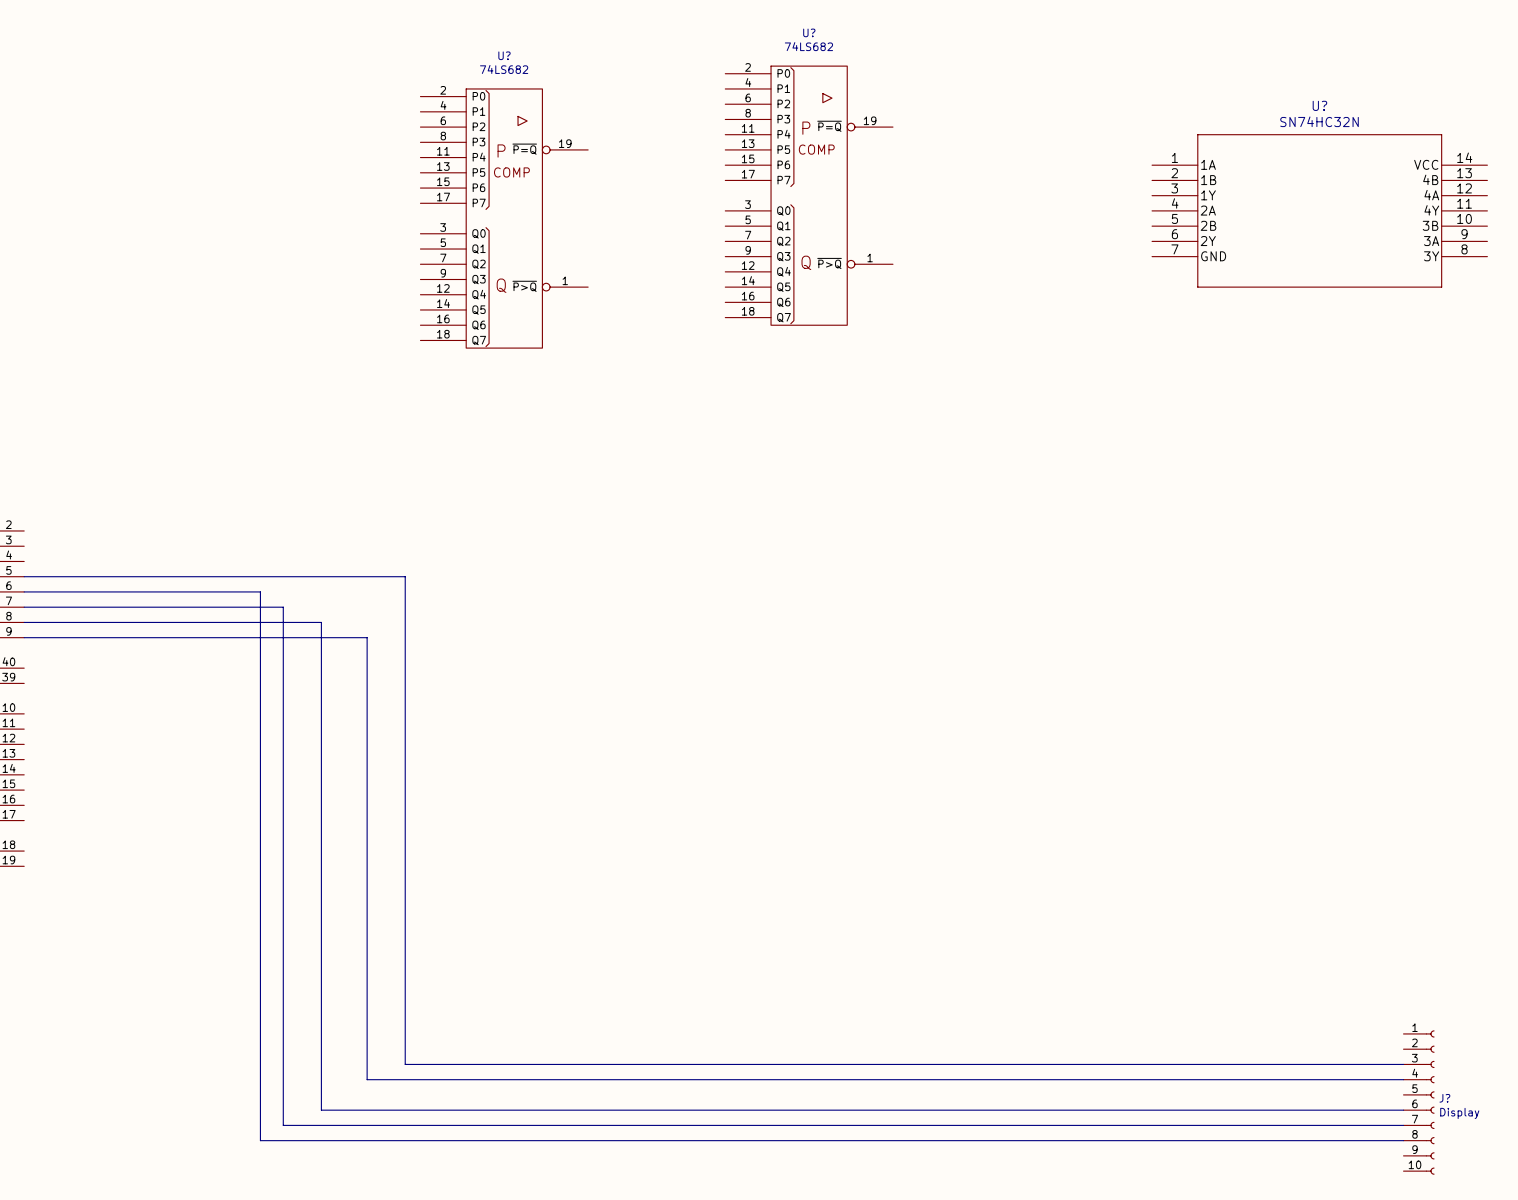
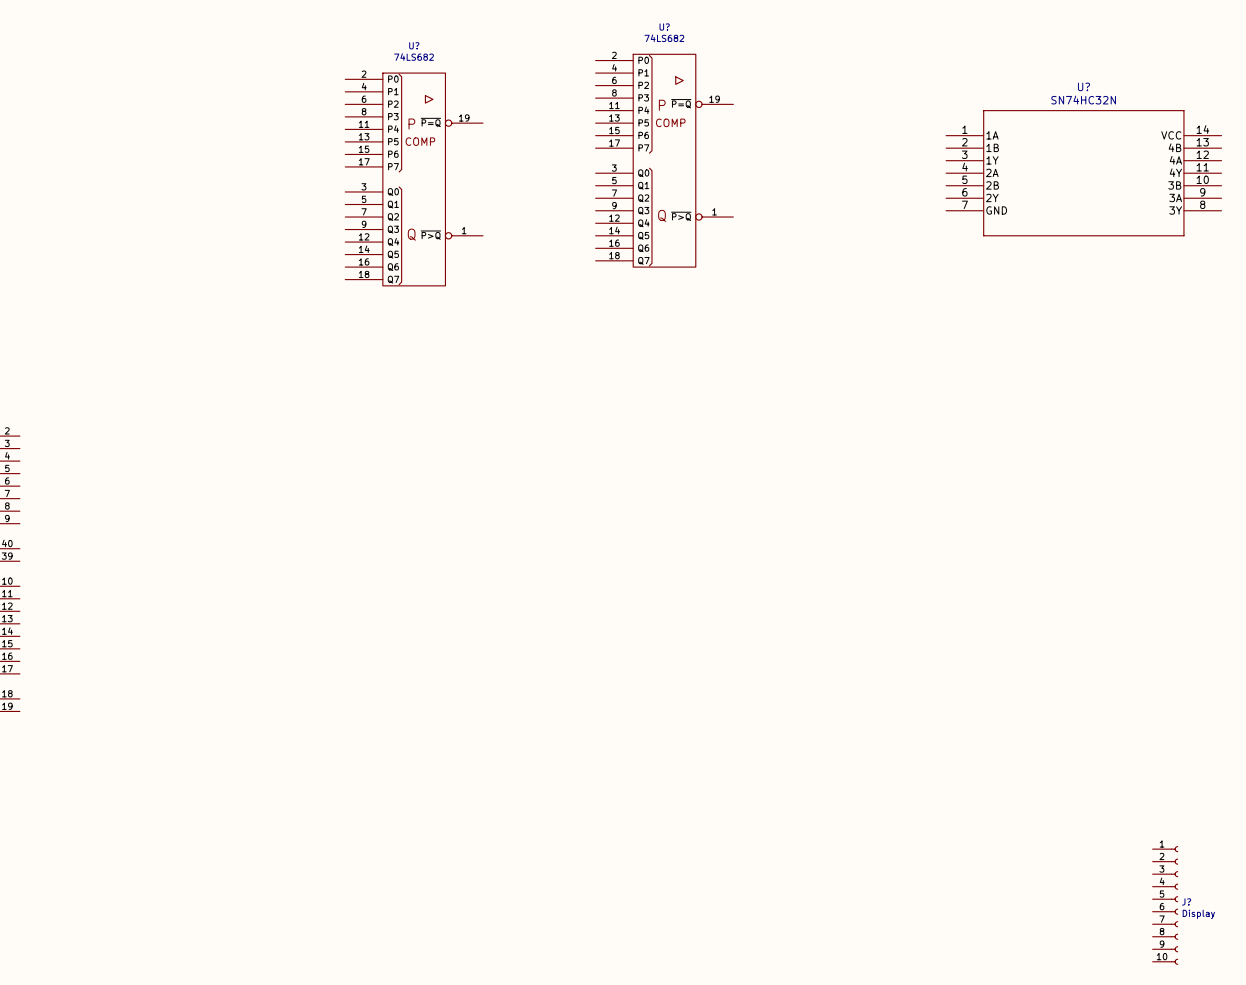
wire: (24, 576) (405, 576) (405, 1064) (1403, 1064) -> none
wire: (24, 591) (260, 591) (260, 1140) (1403, 1140) -> none
wire: (24, 607) (283, 607) (283, 1125) (1403, 1125) -> none
wire: (24, 622) (321, 622) (321, 1110) (1403, 1110) -> none
wire: (24, 637) (367, 637) (367, 1079) (1403, 1079) -> none

